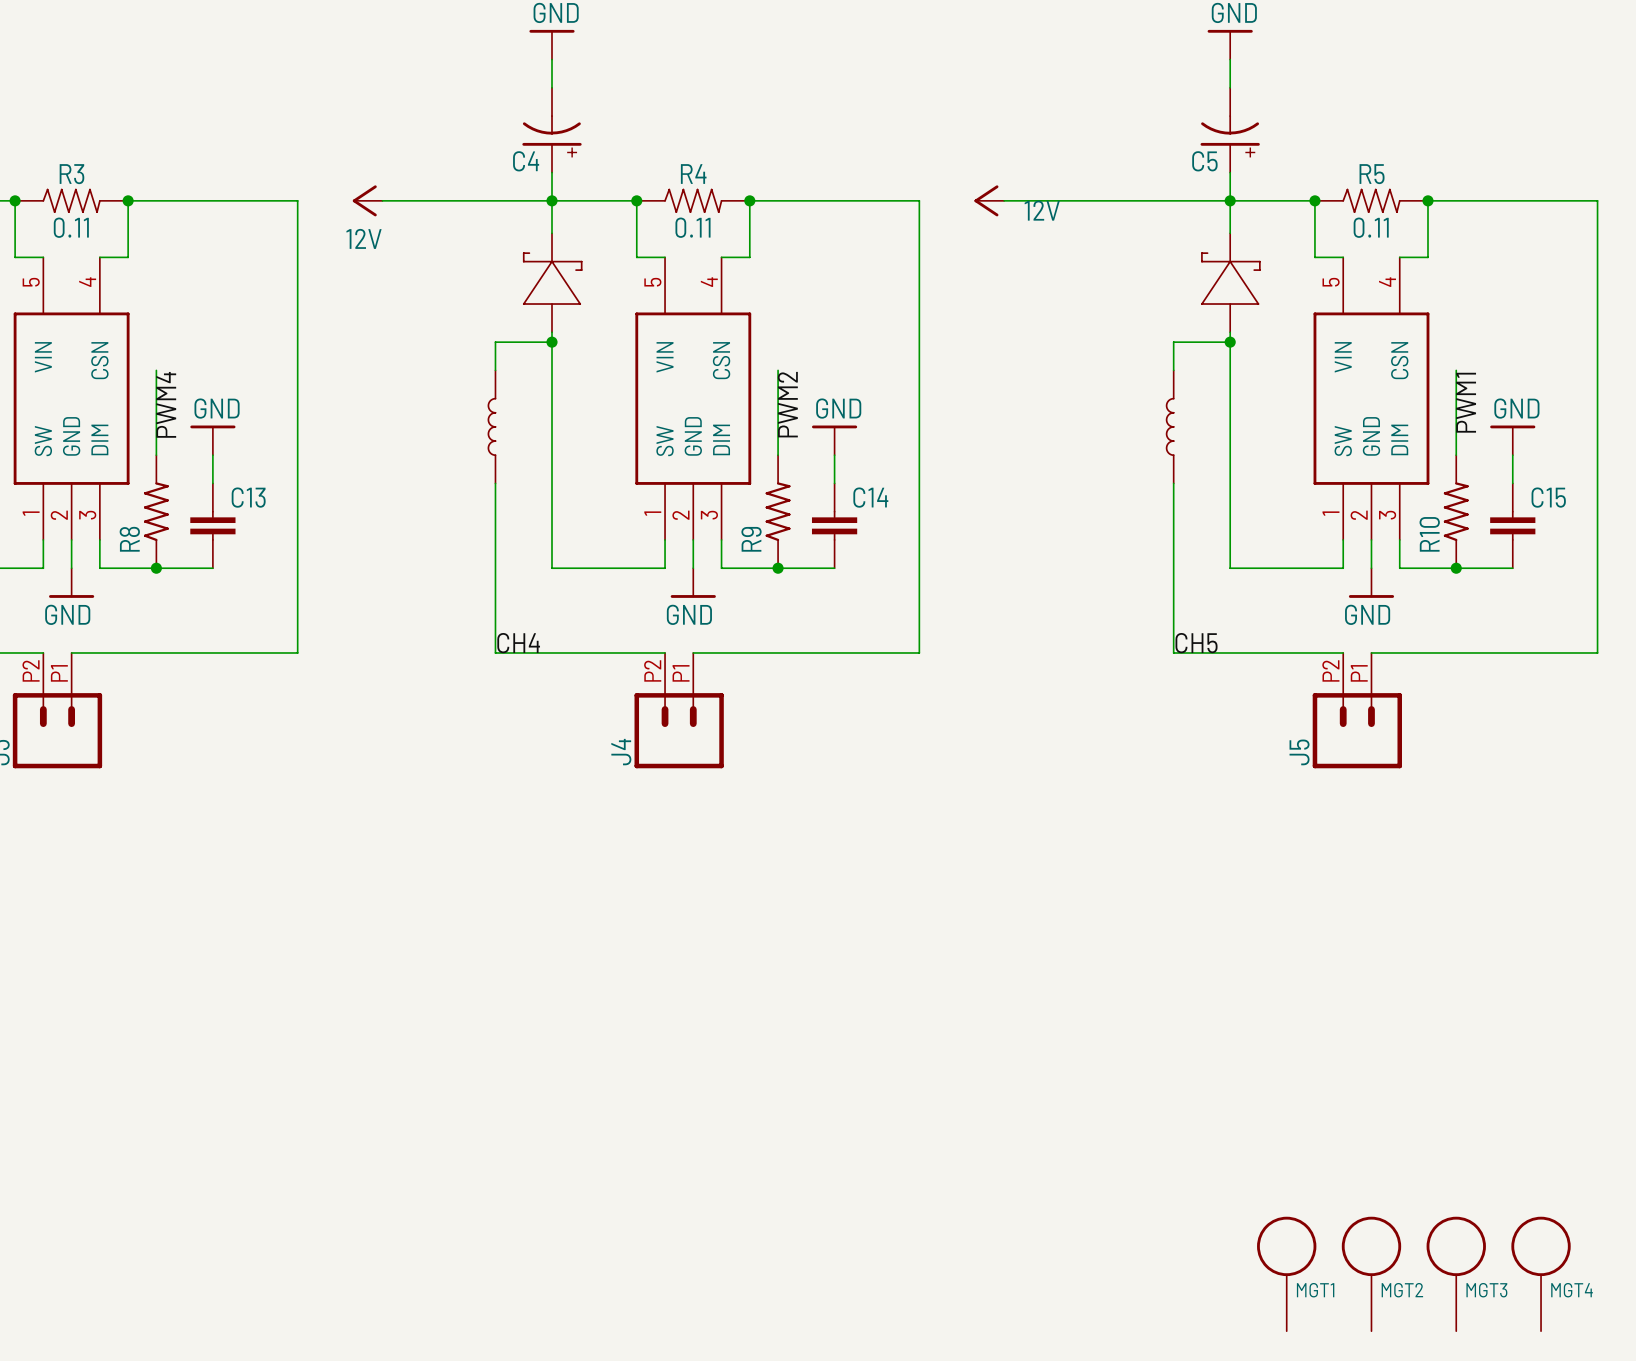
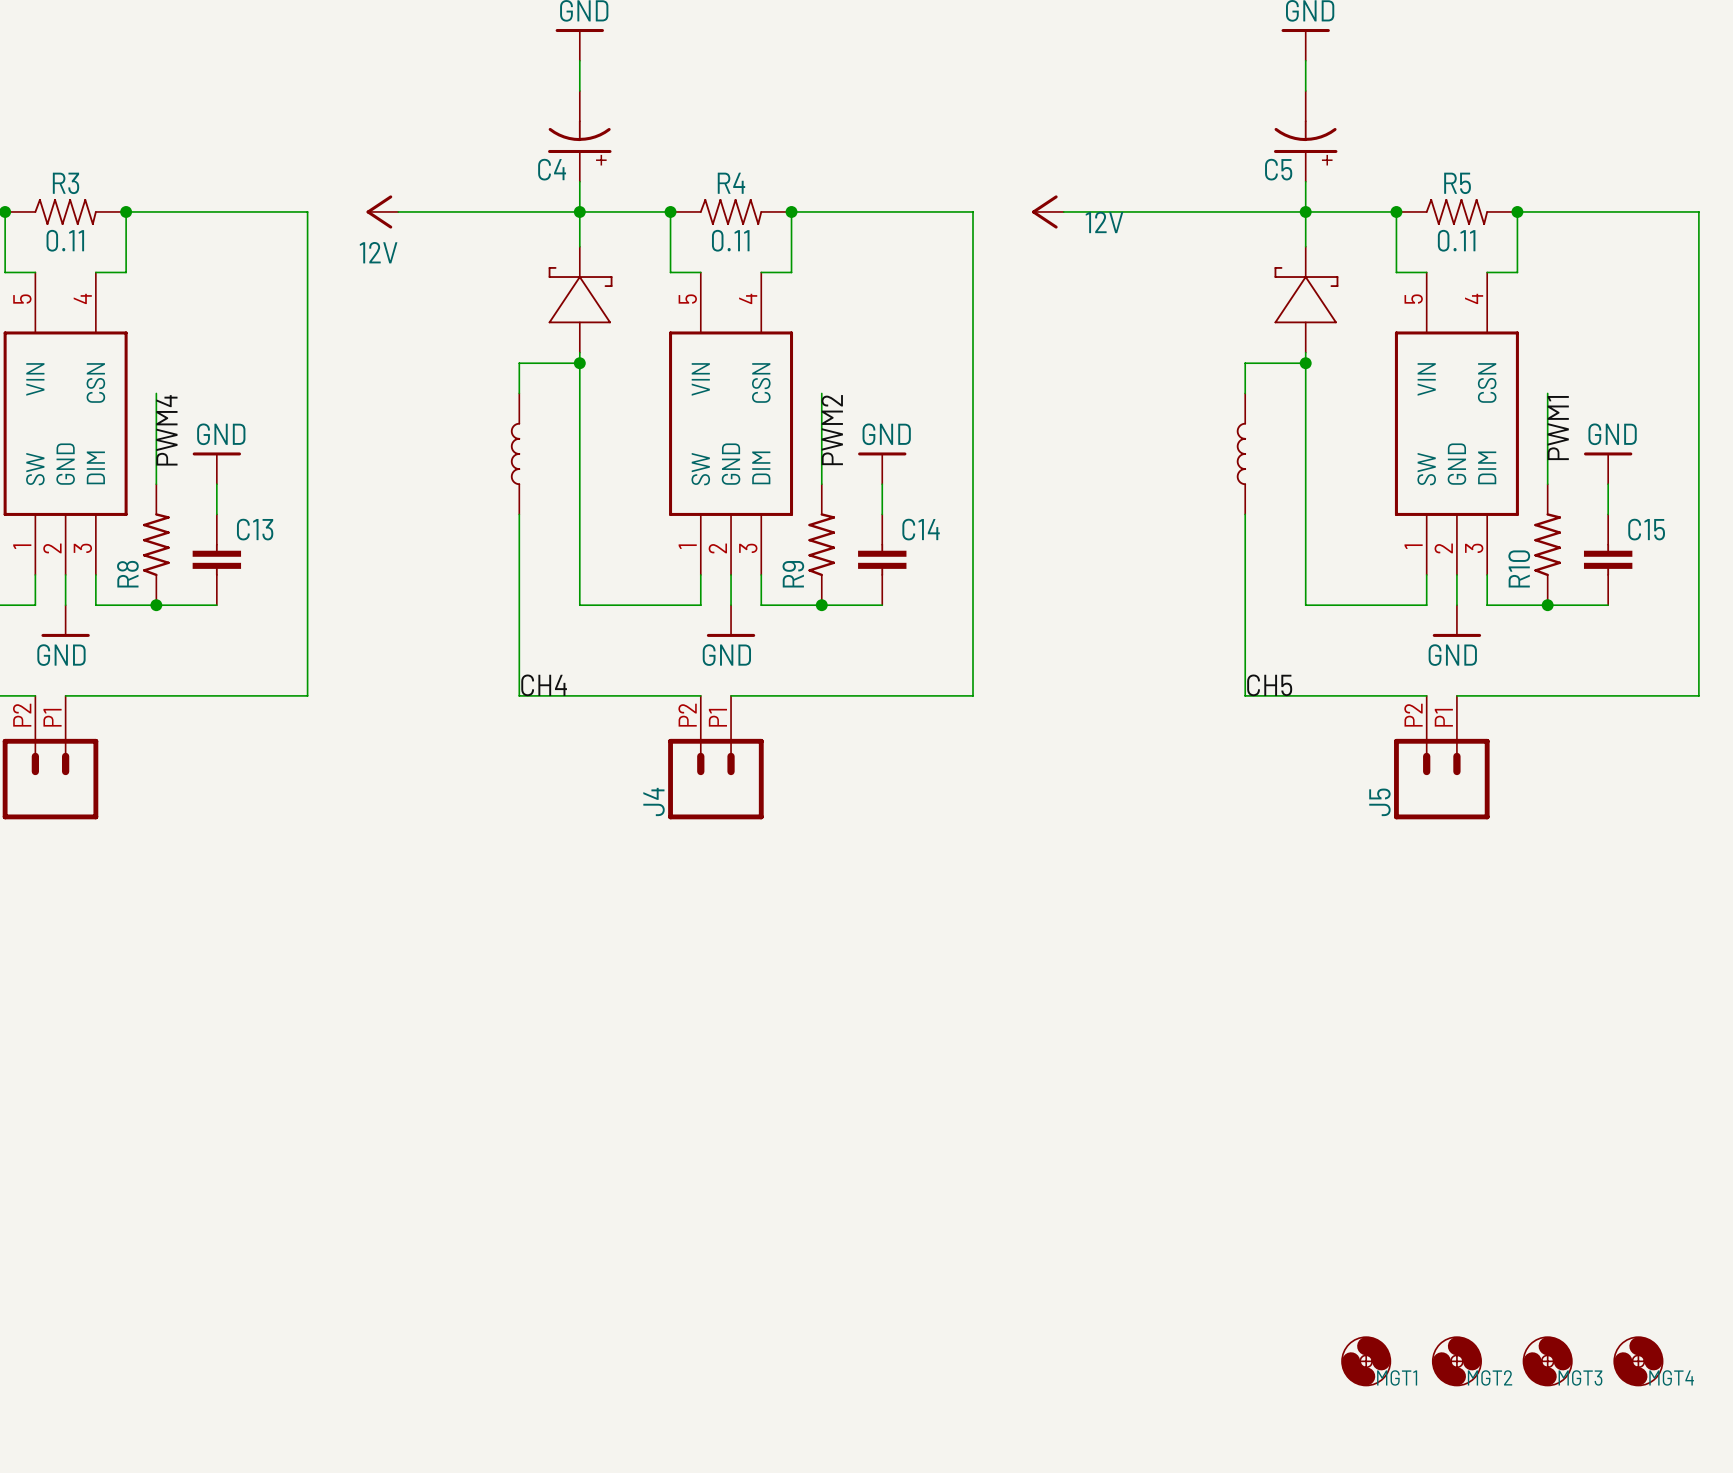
MGT1 symbol: [1257, 1216, 1317, 1332] -> [1341, 1336, 1391, 1386]
MGT2 symbol: [1341, 1216, 1402, 1332] -> [1432, 1336, 1482, 1386]
MGT3 symbol: [1426, 1216, 1486, 1332] -> [1523, 1336, 1573, 1386]
MGT4 symbol: [1511, 1216, 1571, 1332] -> [1613, 1336, 1663, 1386]

